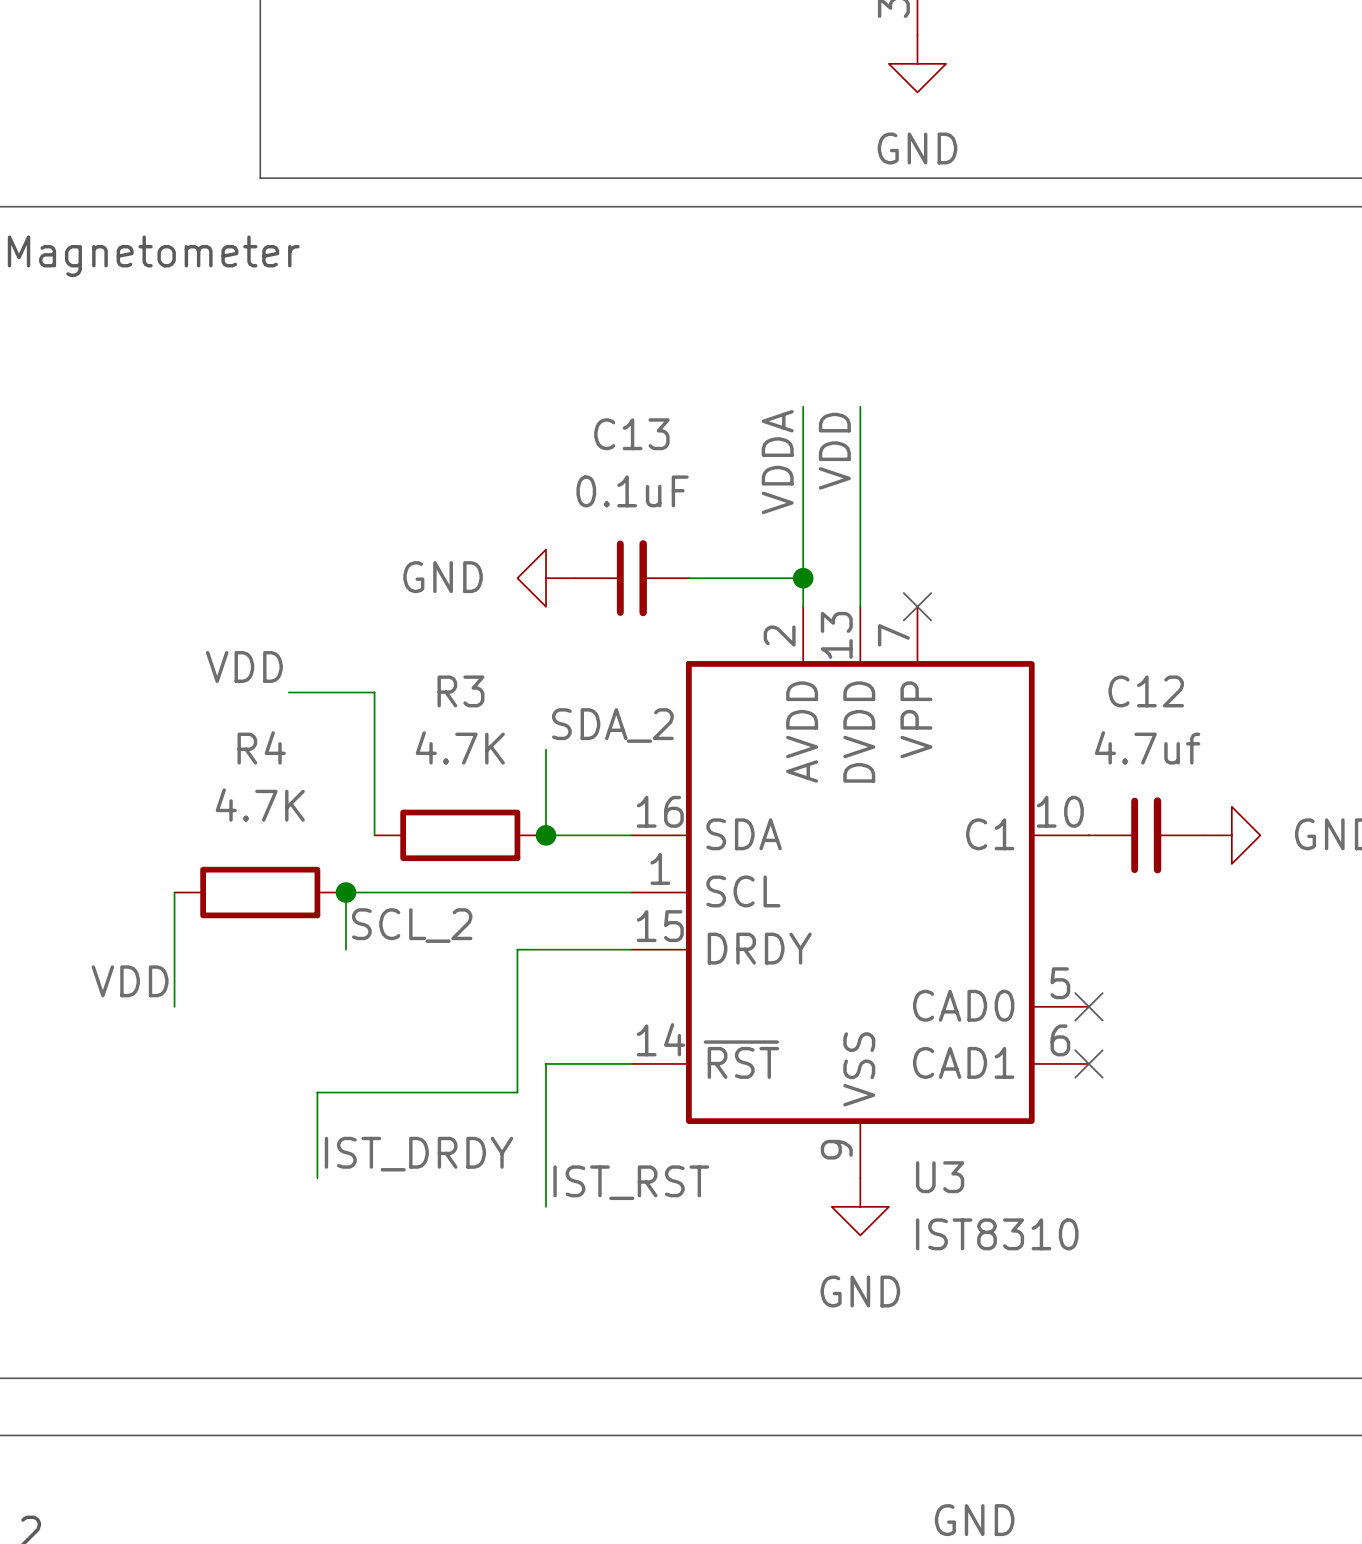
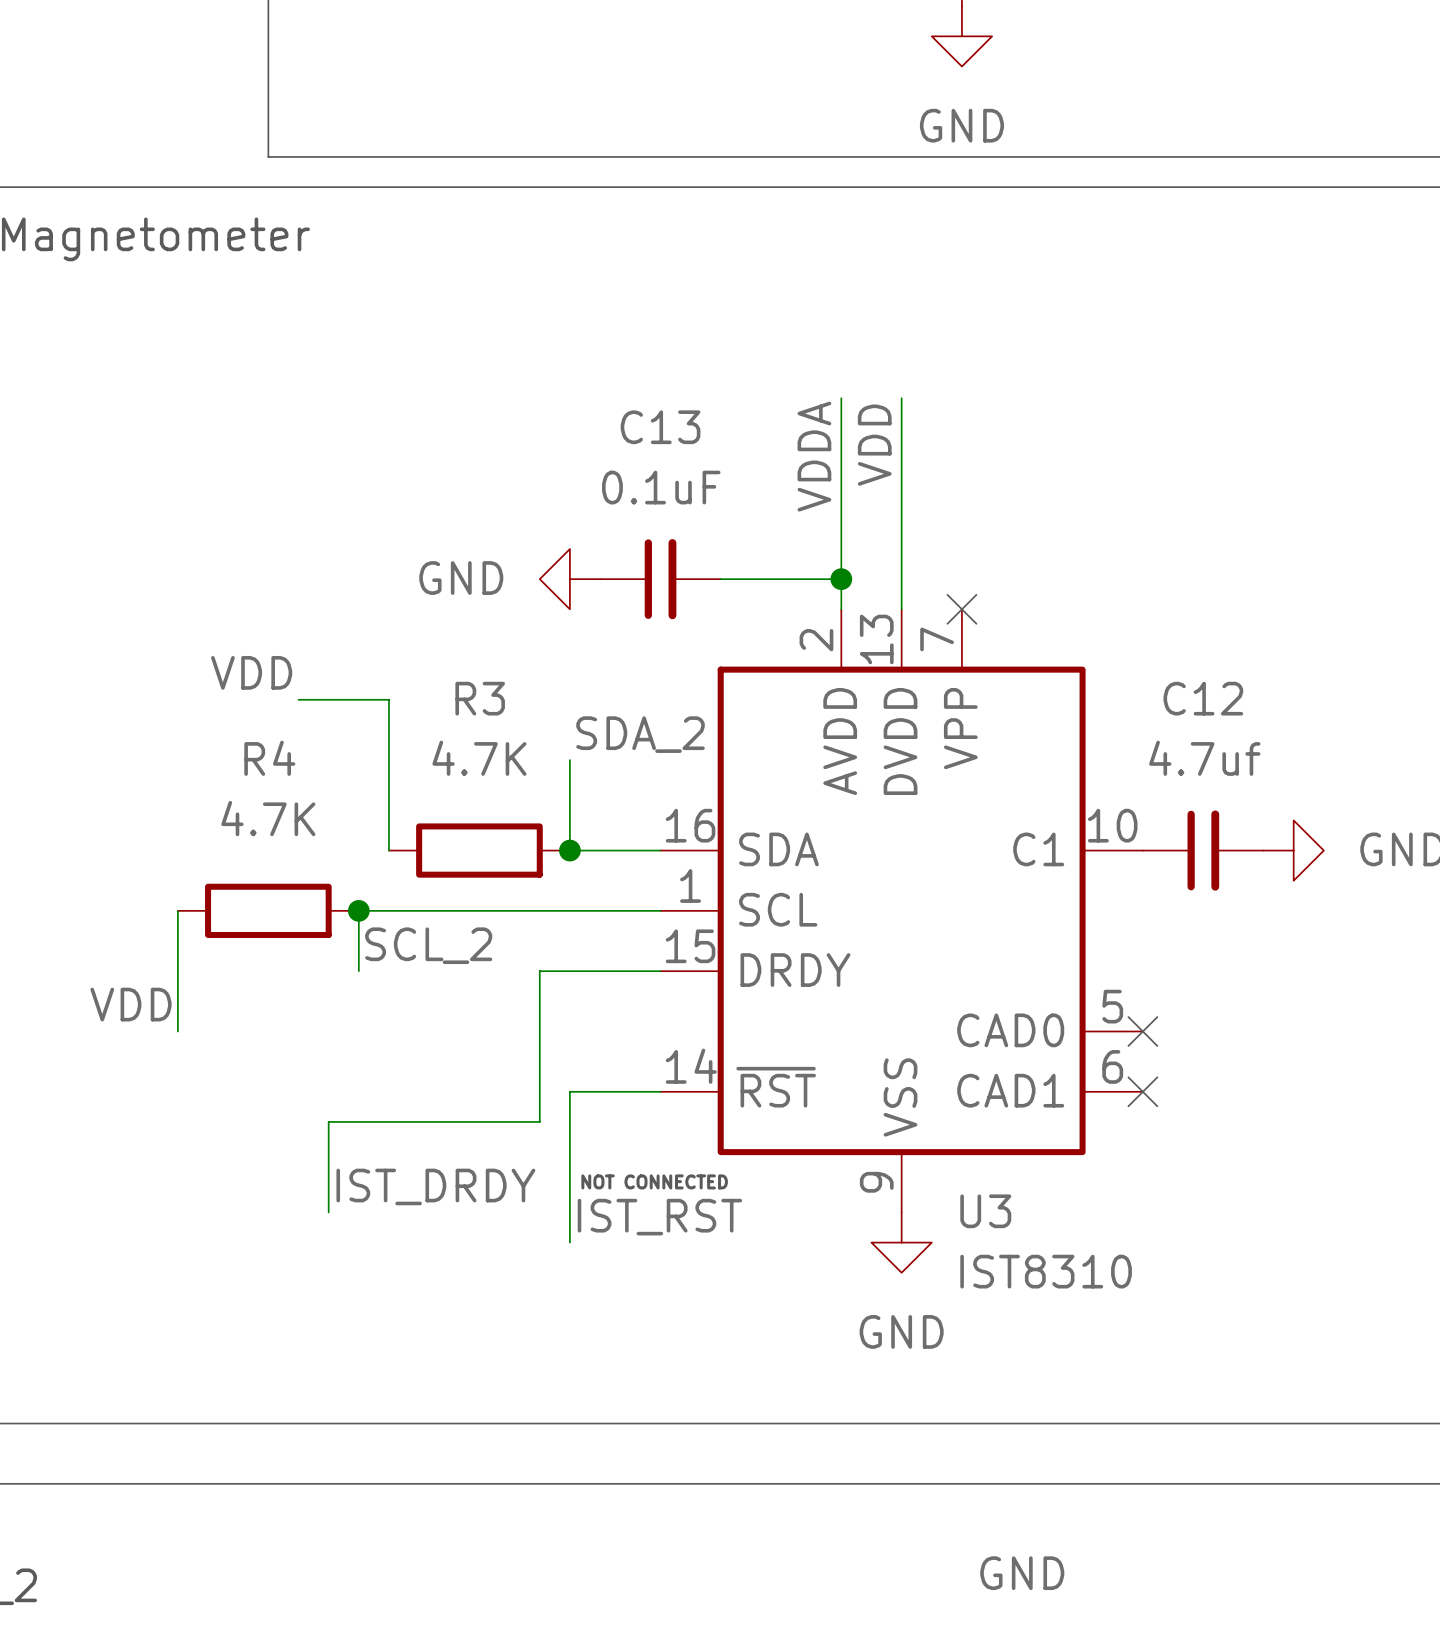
text: none -> NOT CONNECTED (654, 1181)

